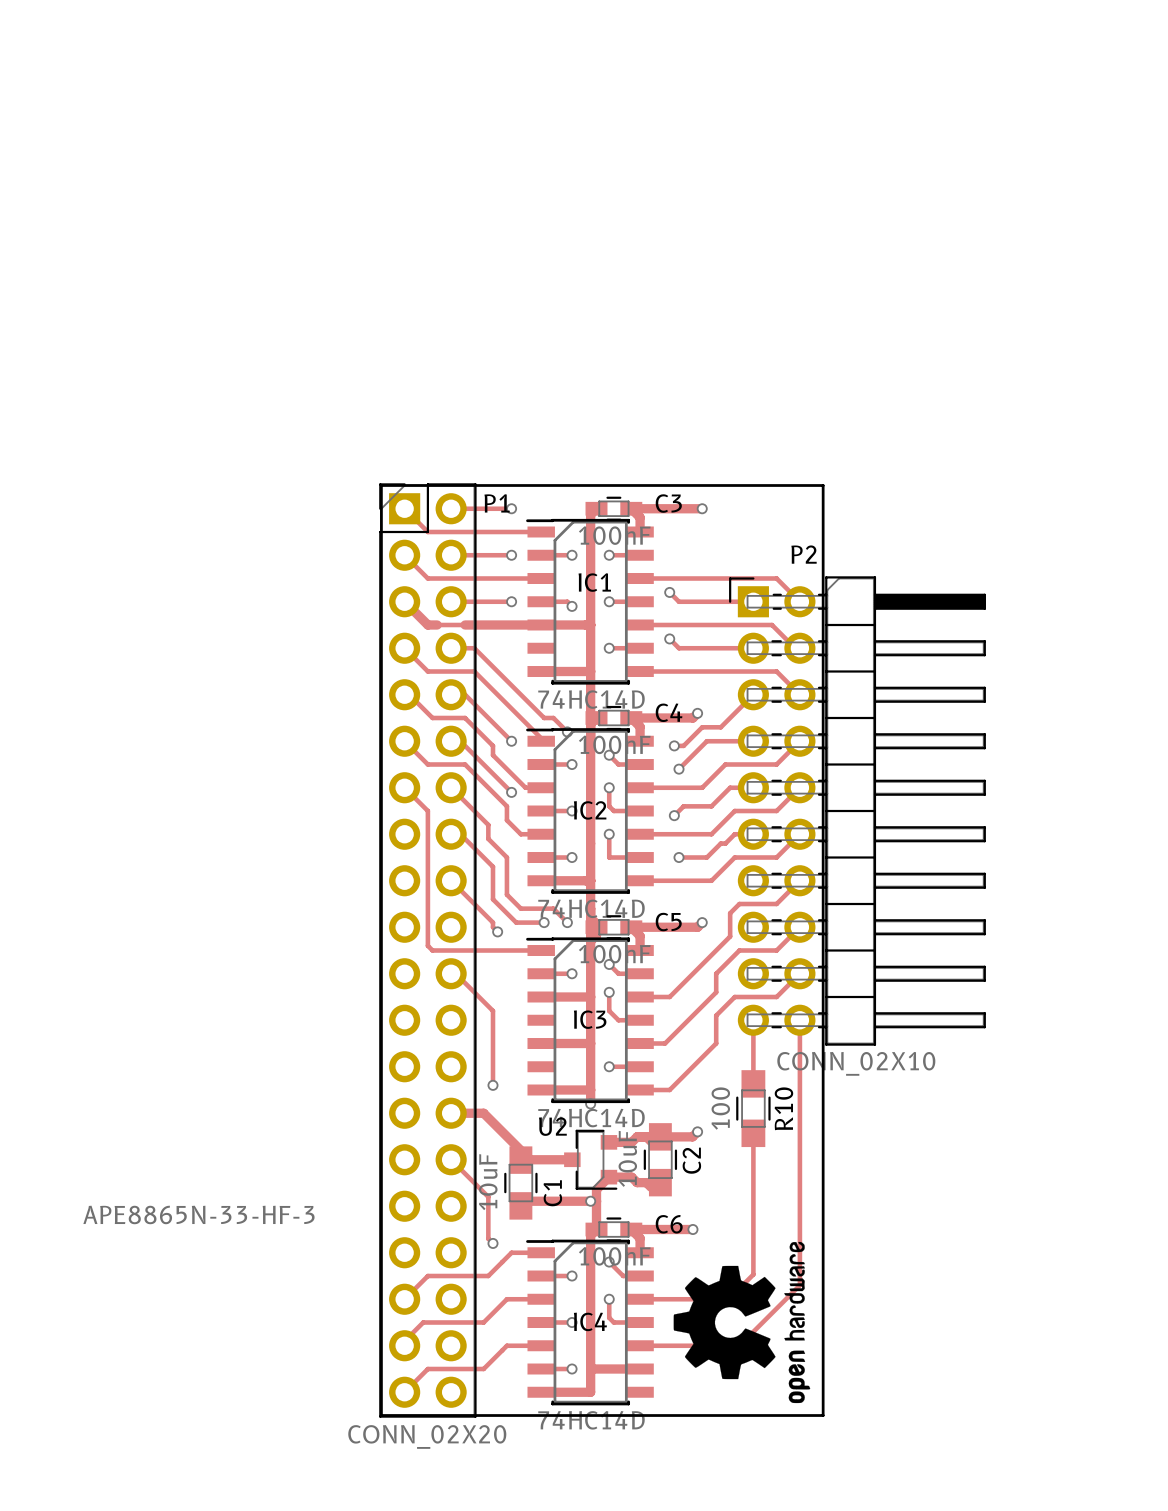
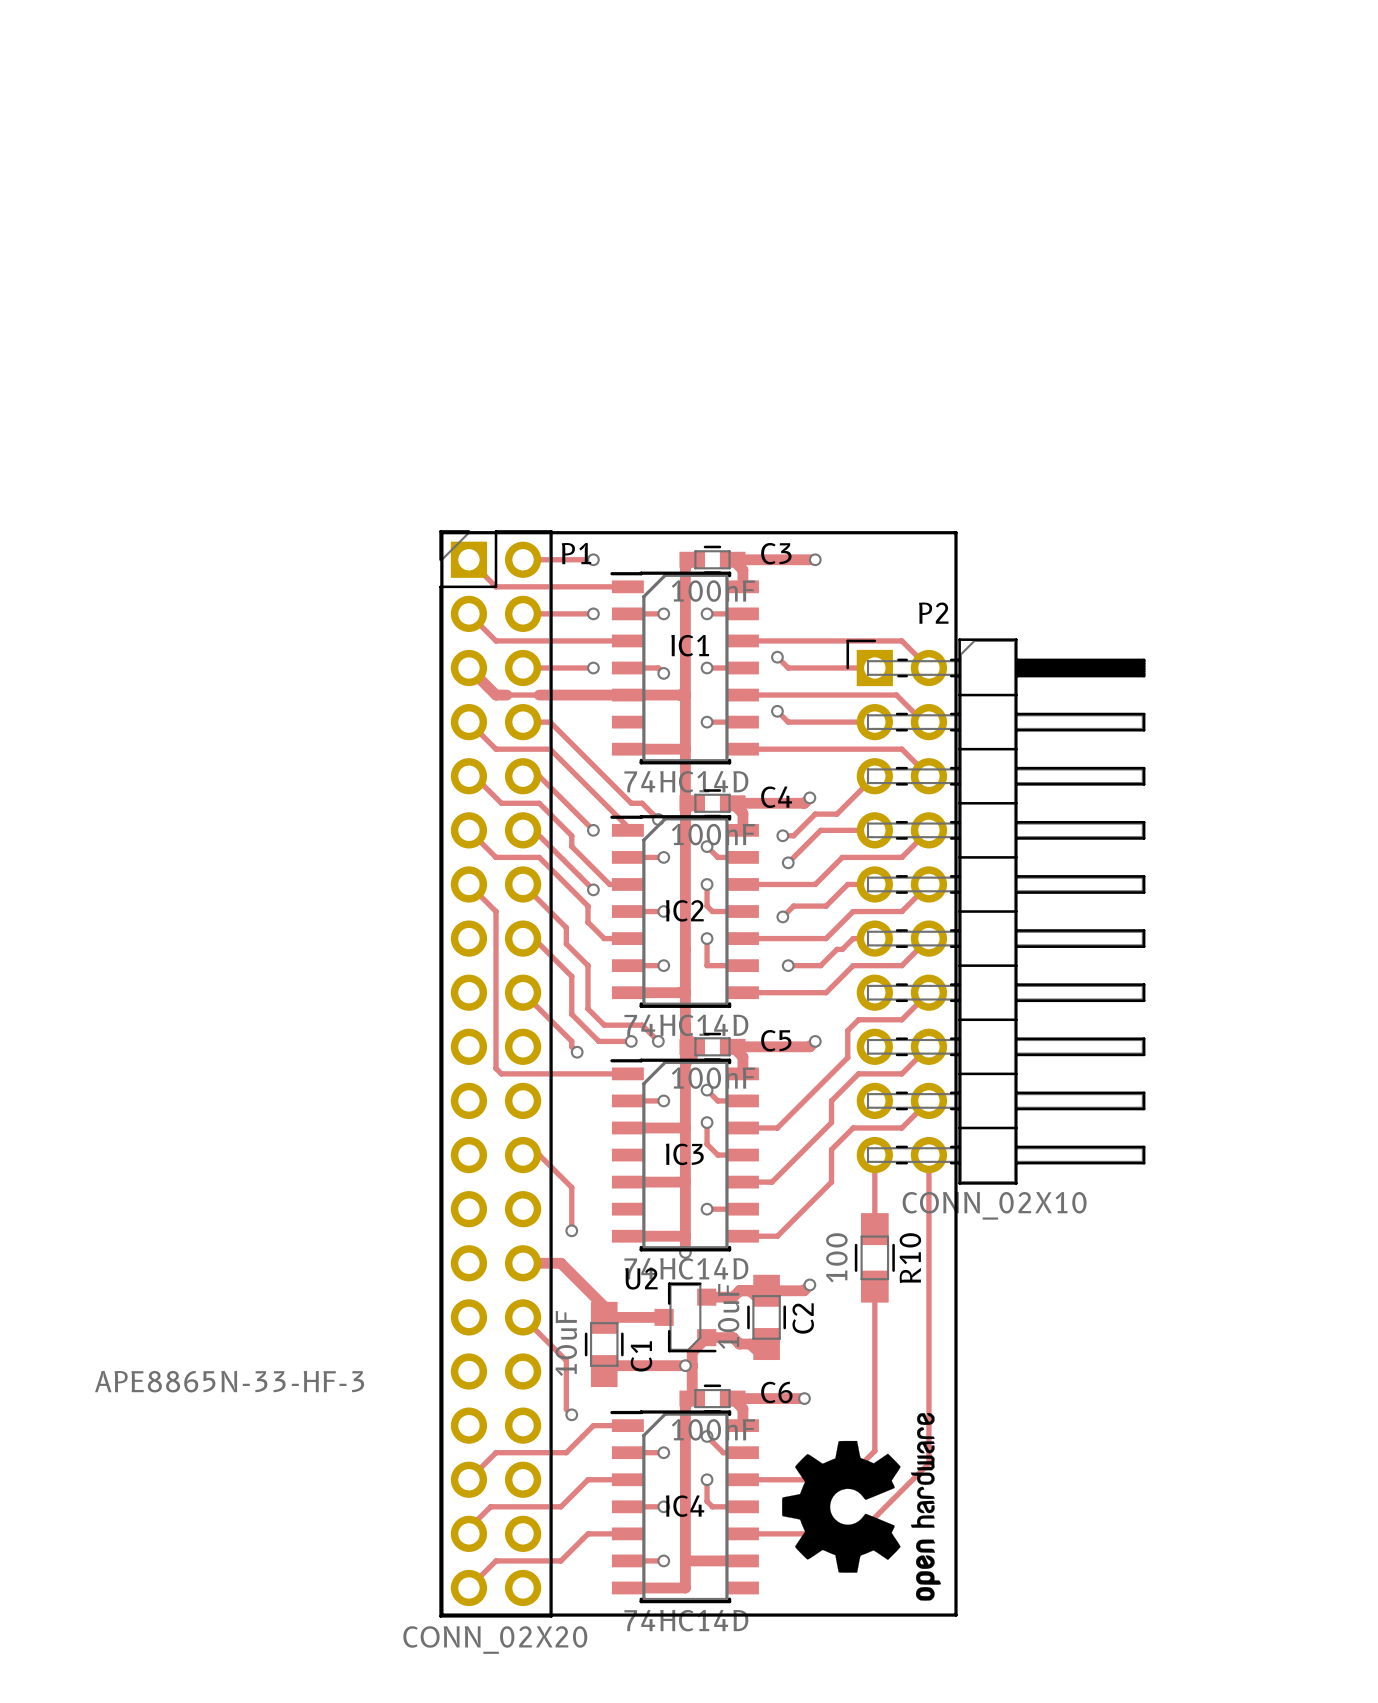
track: (451, 973) (455, 973) (492, 1010) (492, 1048) -> (523, 1155) (539, 1155) (571, 1187)

